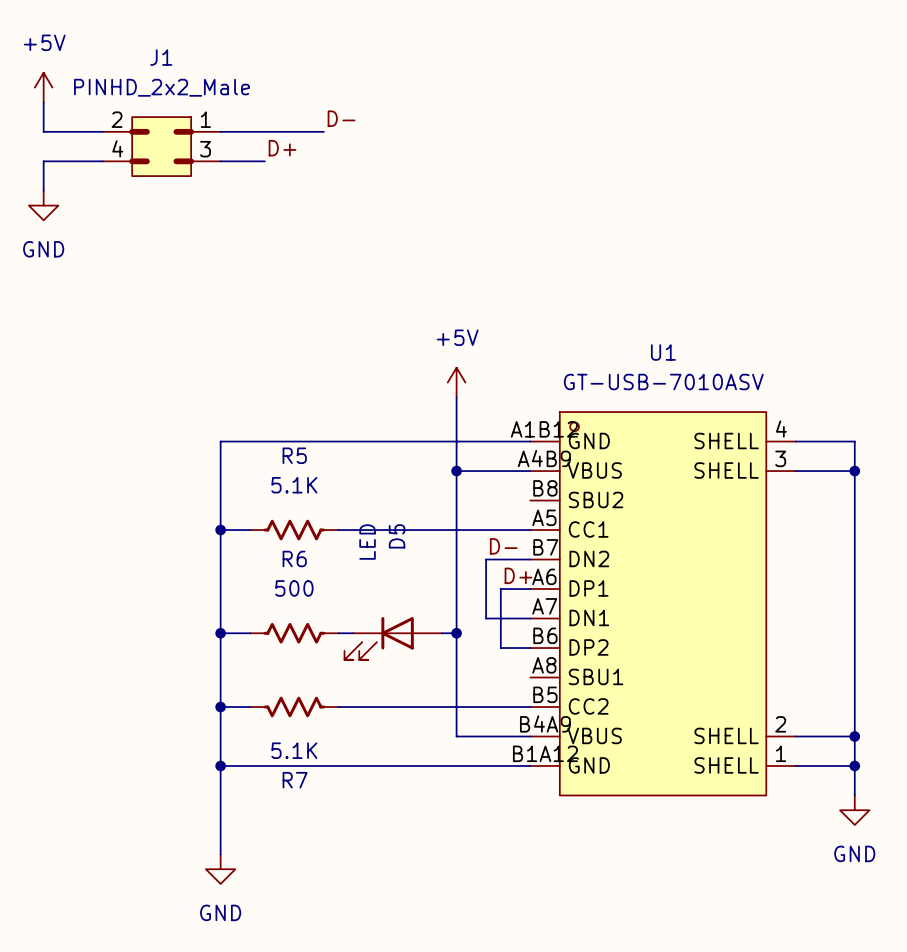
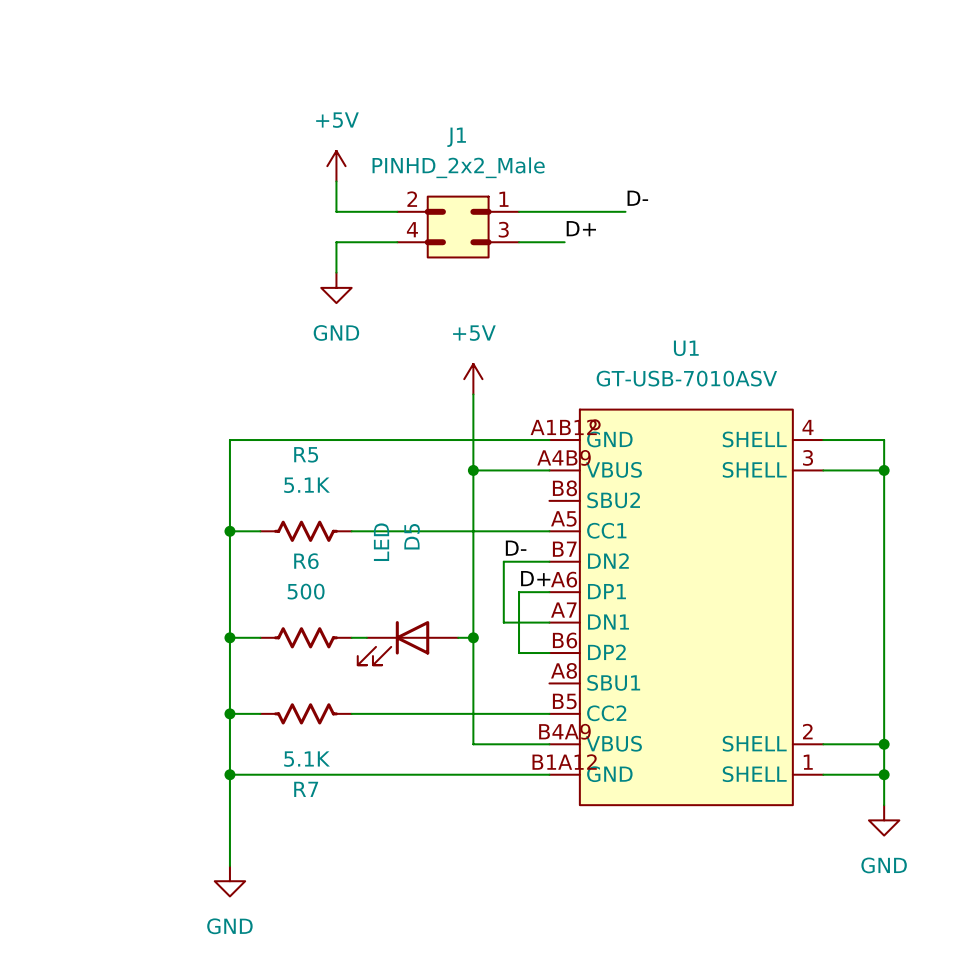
power symbol: +5V (43, 87) -> none
wire: (43, 102) (43, 131) (102, 131) -> none
label: D- (341, 118) -> none
wire: (220, 131) (323, 131) -> none
J1 position: (161, 146) -> (458, 227)
label: D+ (282, 148) -> none
wire: (102, 161) (43, 161) (43, 190) -> none
wire: (220, 161) (264, 161) -> none
power symbol: none -> +5V (336, 166)
wire: none -> (336, 181) (336, 211) (397, 211)
power symbol: GND (43, 205) -> none
label: none -> D- (637, 198)
wire: none -> (519, 211) (625, 211)
label: none -> D+ (581, 228)
wire: none -> (397, 242) (336, 242) (336, 272)
wire: none -> (519, 242) (564, 242)
power symbol: none -> GND (336, 287)

